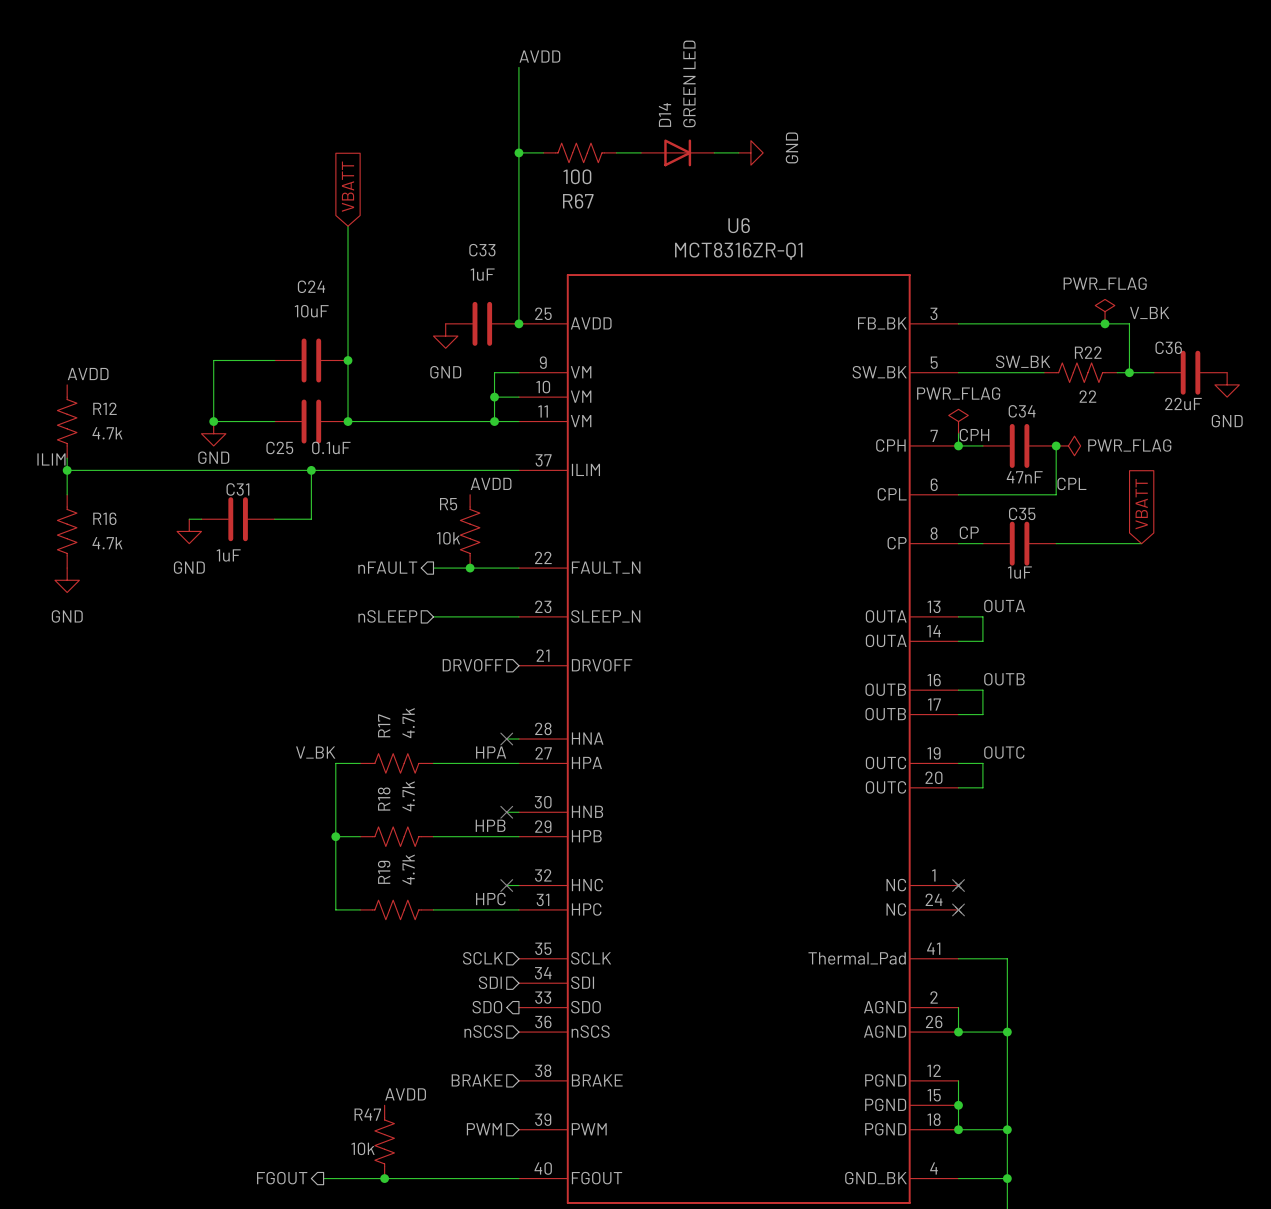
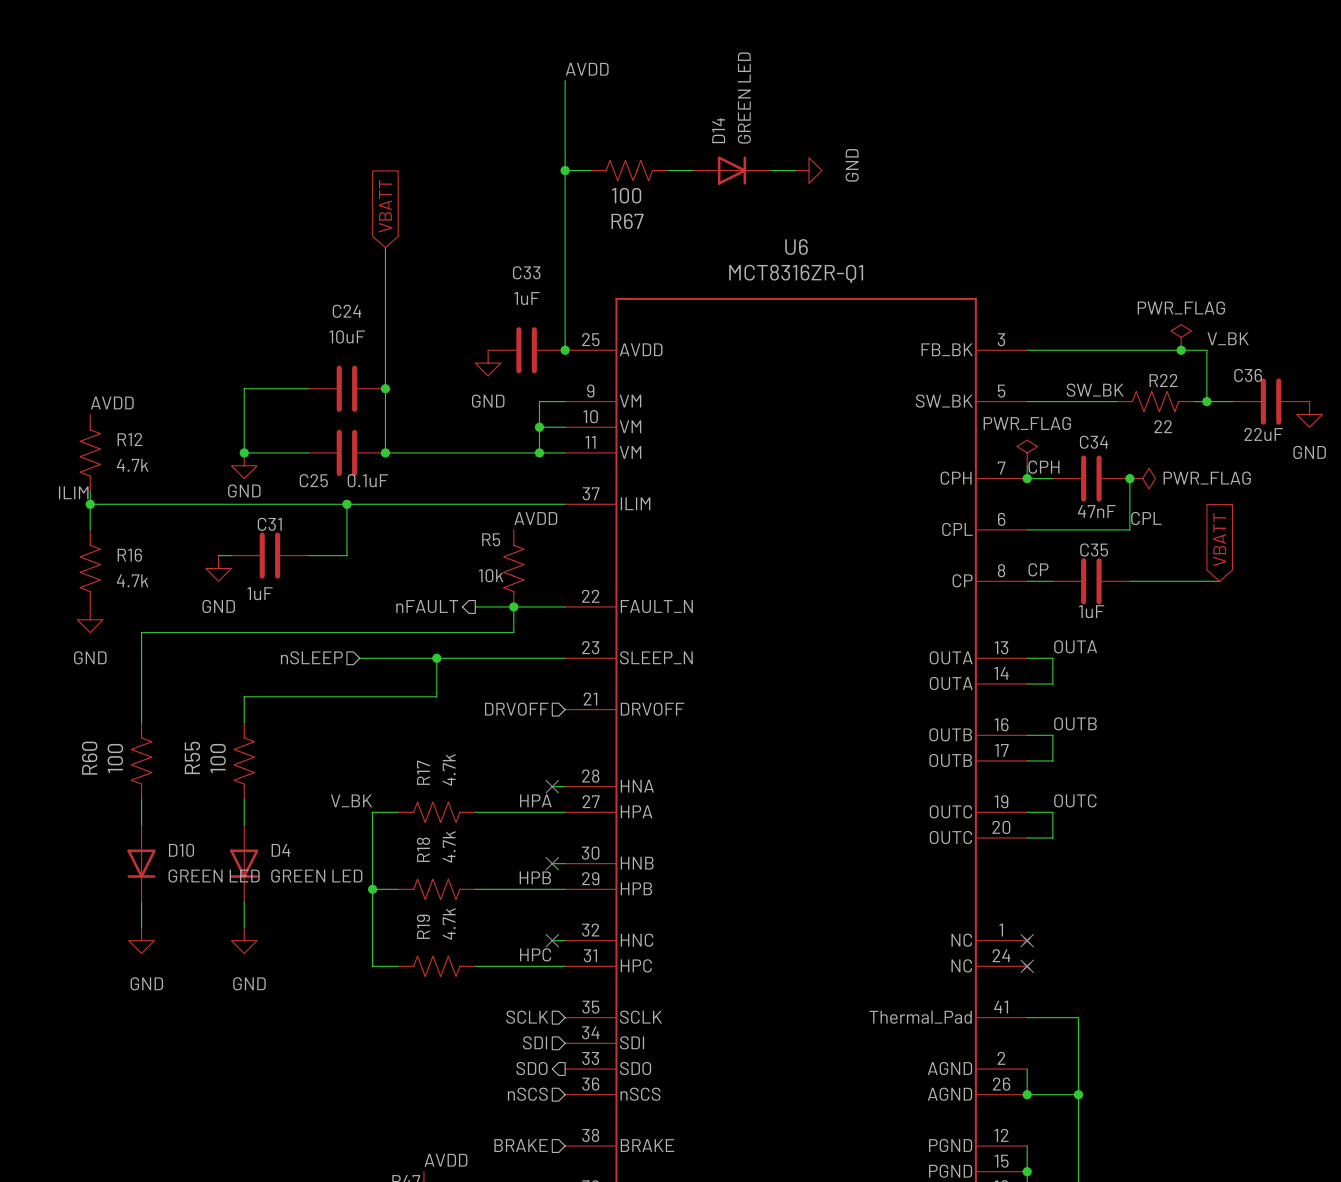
wire: none -> (513, 606) (513, 632) (141, 632) (141, 722)
wire: none -> (359, 658) (475, 658)
hierarchical label position: nSLEEP (387, 616) -> nSLEEP (311, 657)
wire: none -> (436, 658) (436, 696) (244, 696) (244, 722)
junction: none -> (436, 658)
R60: none -> 100 (141, 760)
R55: none -> 100 (244, 760)
wire: none -> (141, 799) (141, 825)
wire: none -> (244, 799) (244, 825)
D10: none -> GREEN LED (141, 863)
D4: none -> GREEN LED (244, 863)
wire: none -> (141, 902) (141, 927)
wire: none -> (244, 902) (244, 927)
power symbol: none -> GND (141, 940)
power symbol: none -> GND (244, 940)

